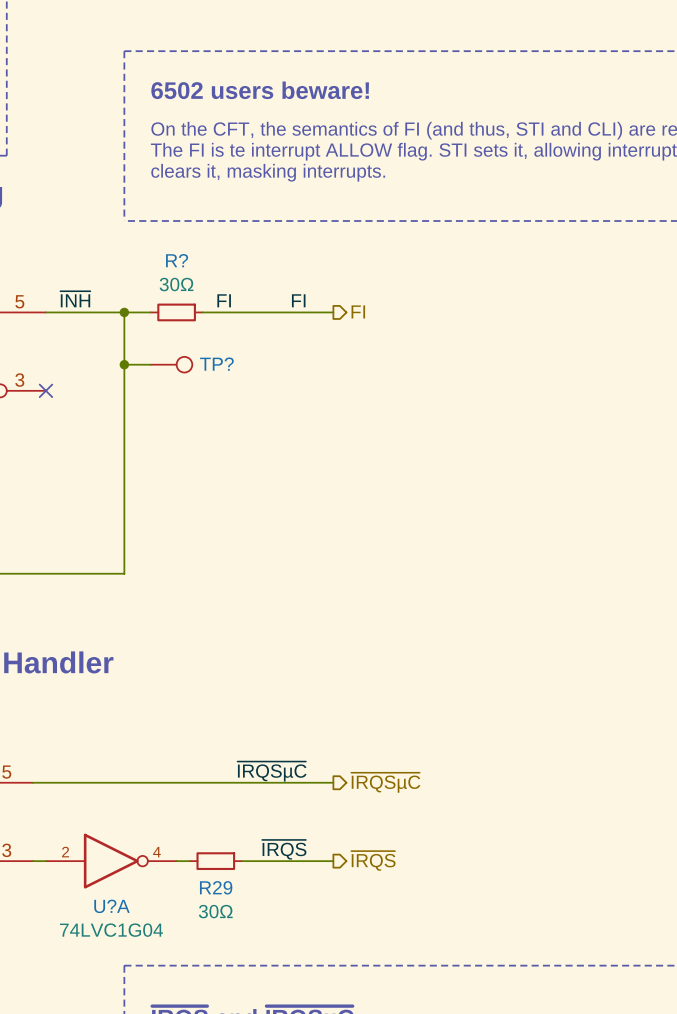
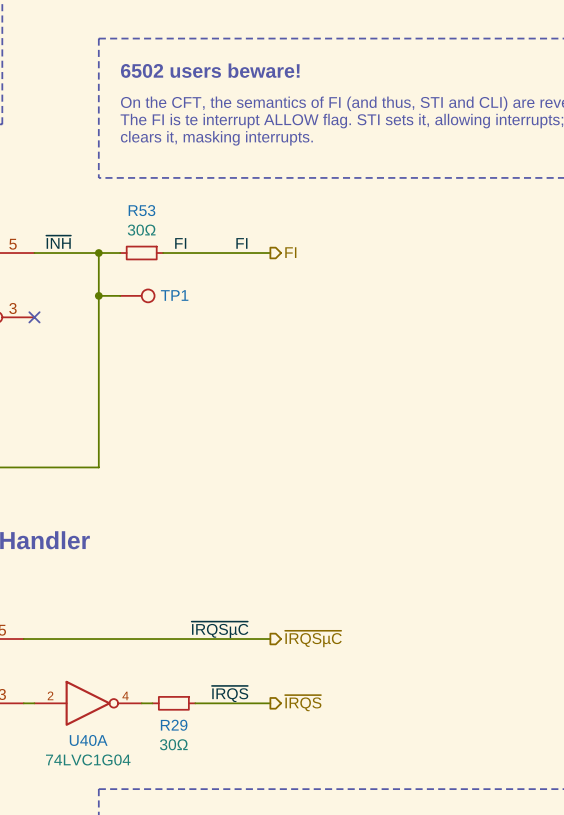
R? name: R? (177, 260) -> R53 (141, 210)
TP? name: TP? (216, 364) -> TP1 (174, 295)
U?A name: U?A (112, 906) -> U40A (88, 740)

